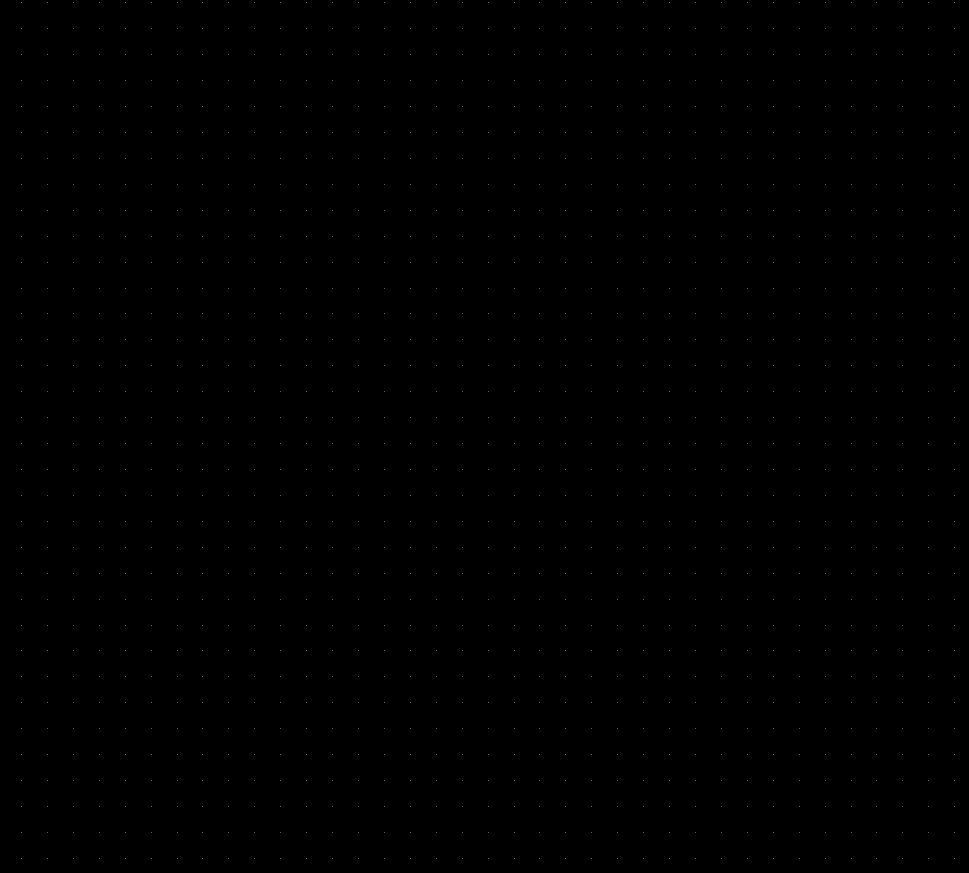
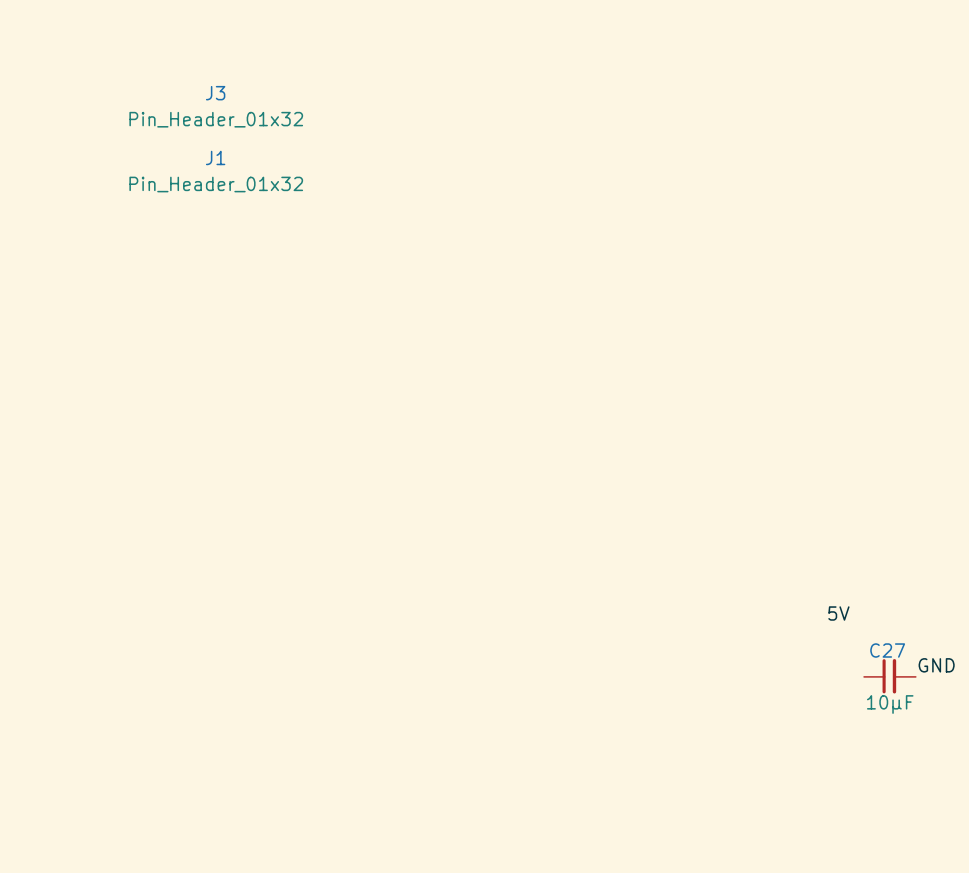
J3: none -> Pin_Header_01x32 (216, 106)
J1: none -> Pin_Header_01x32 (216, 171)
label: none -> 5V (838, 613)
label: none -> GND (936, 665)
C27: none -> 10μF (889, 676)

